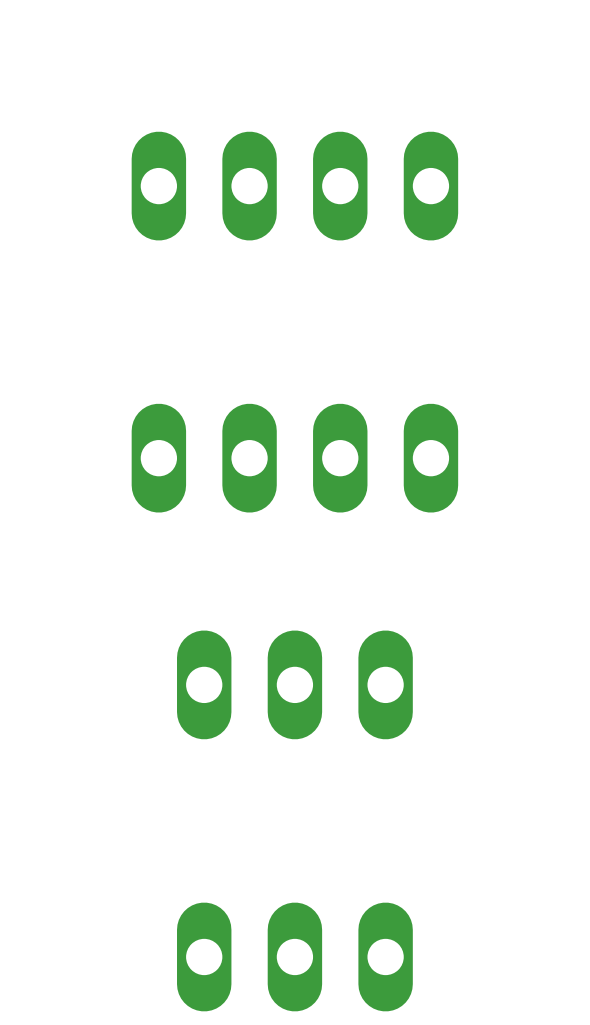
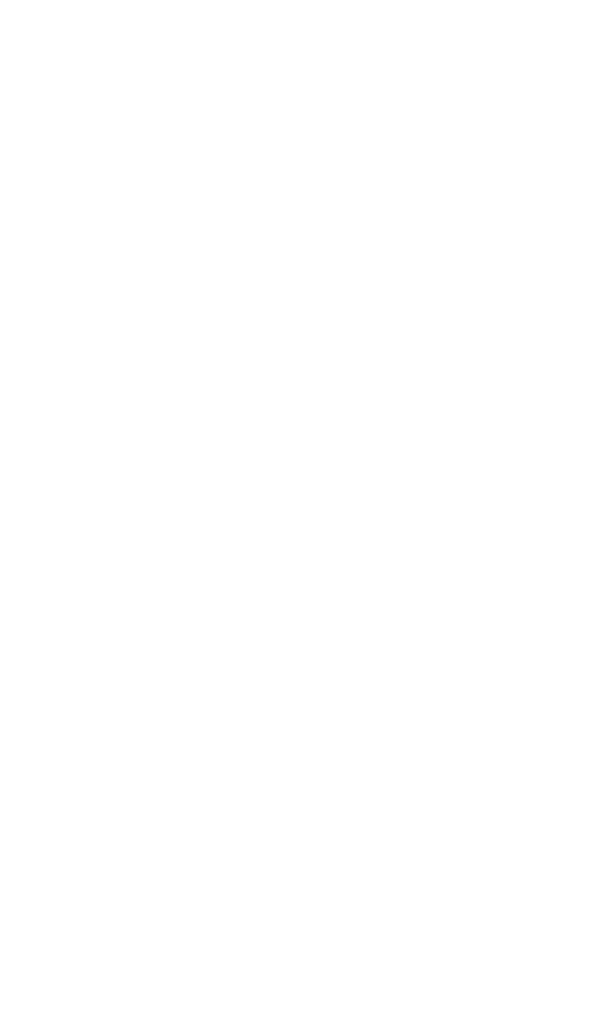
part: (294, 186) -> none
part: (294, 458) -> none
part: (294, 684) -> none
part: (294, 956) -> none

